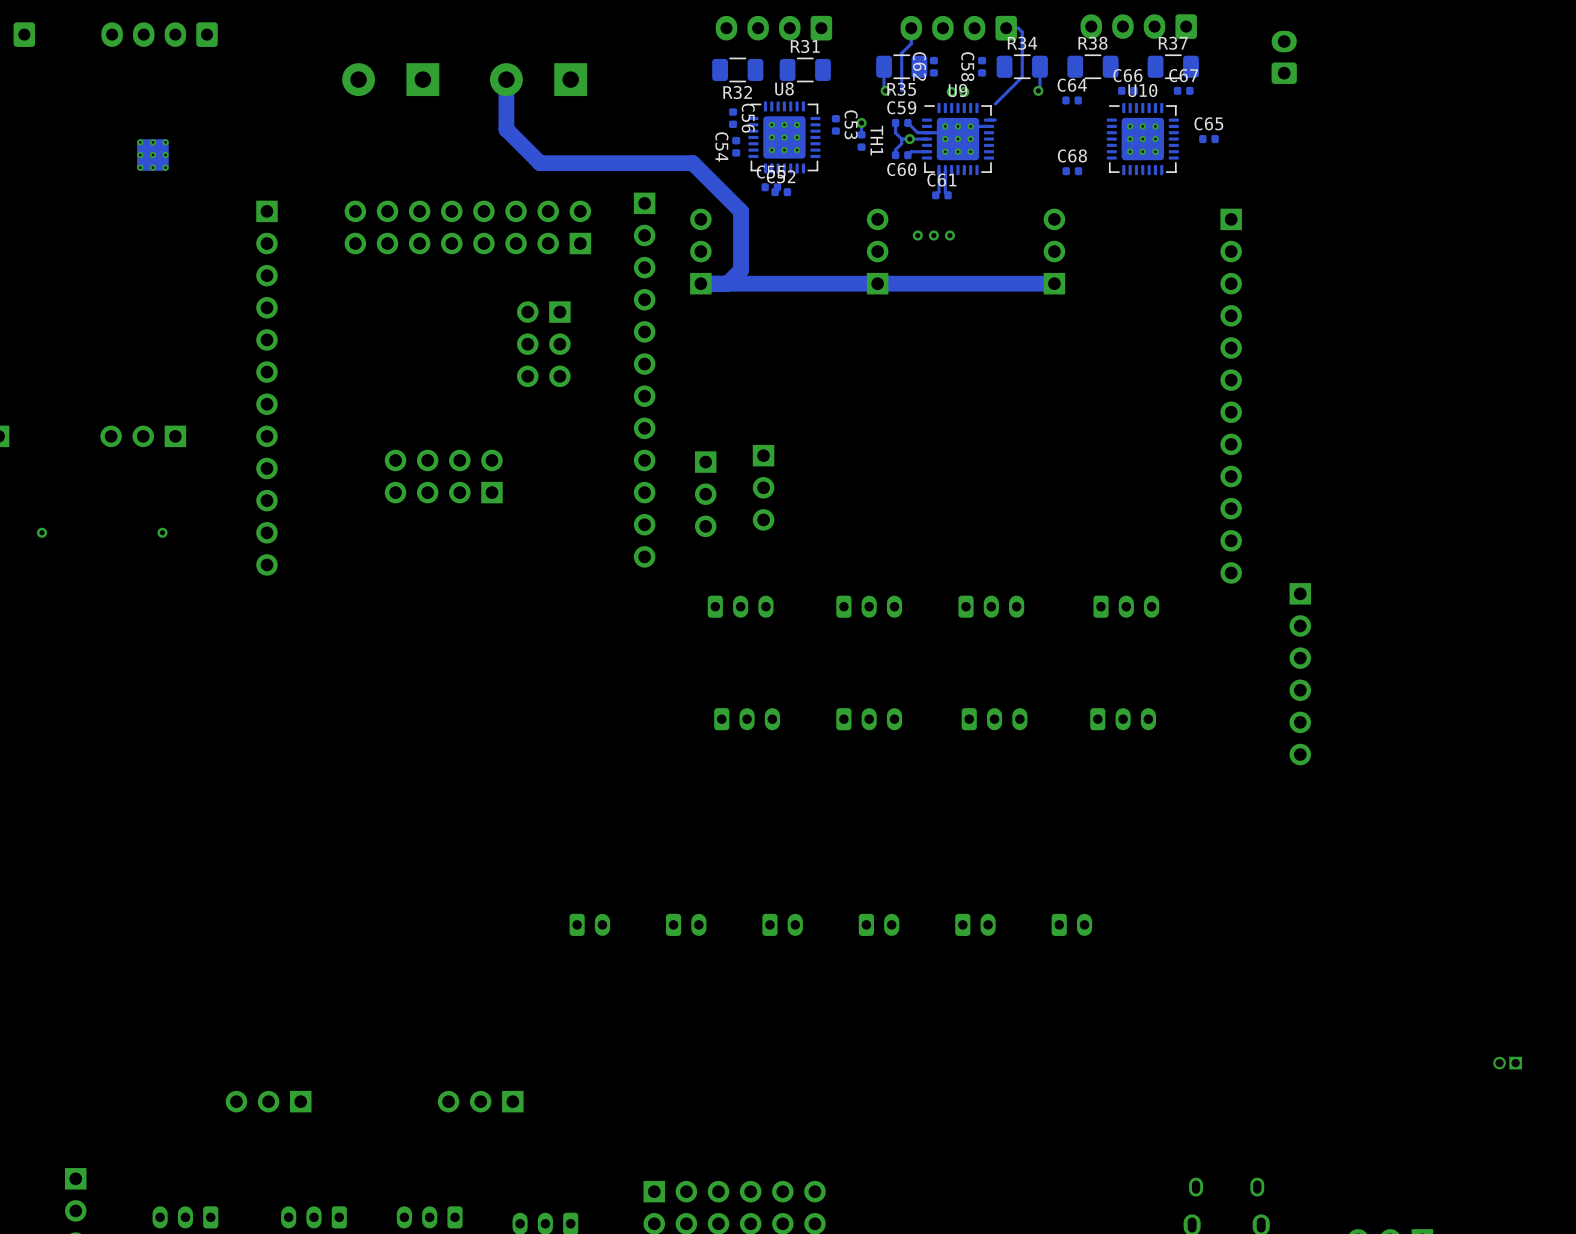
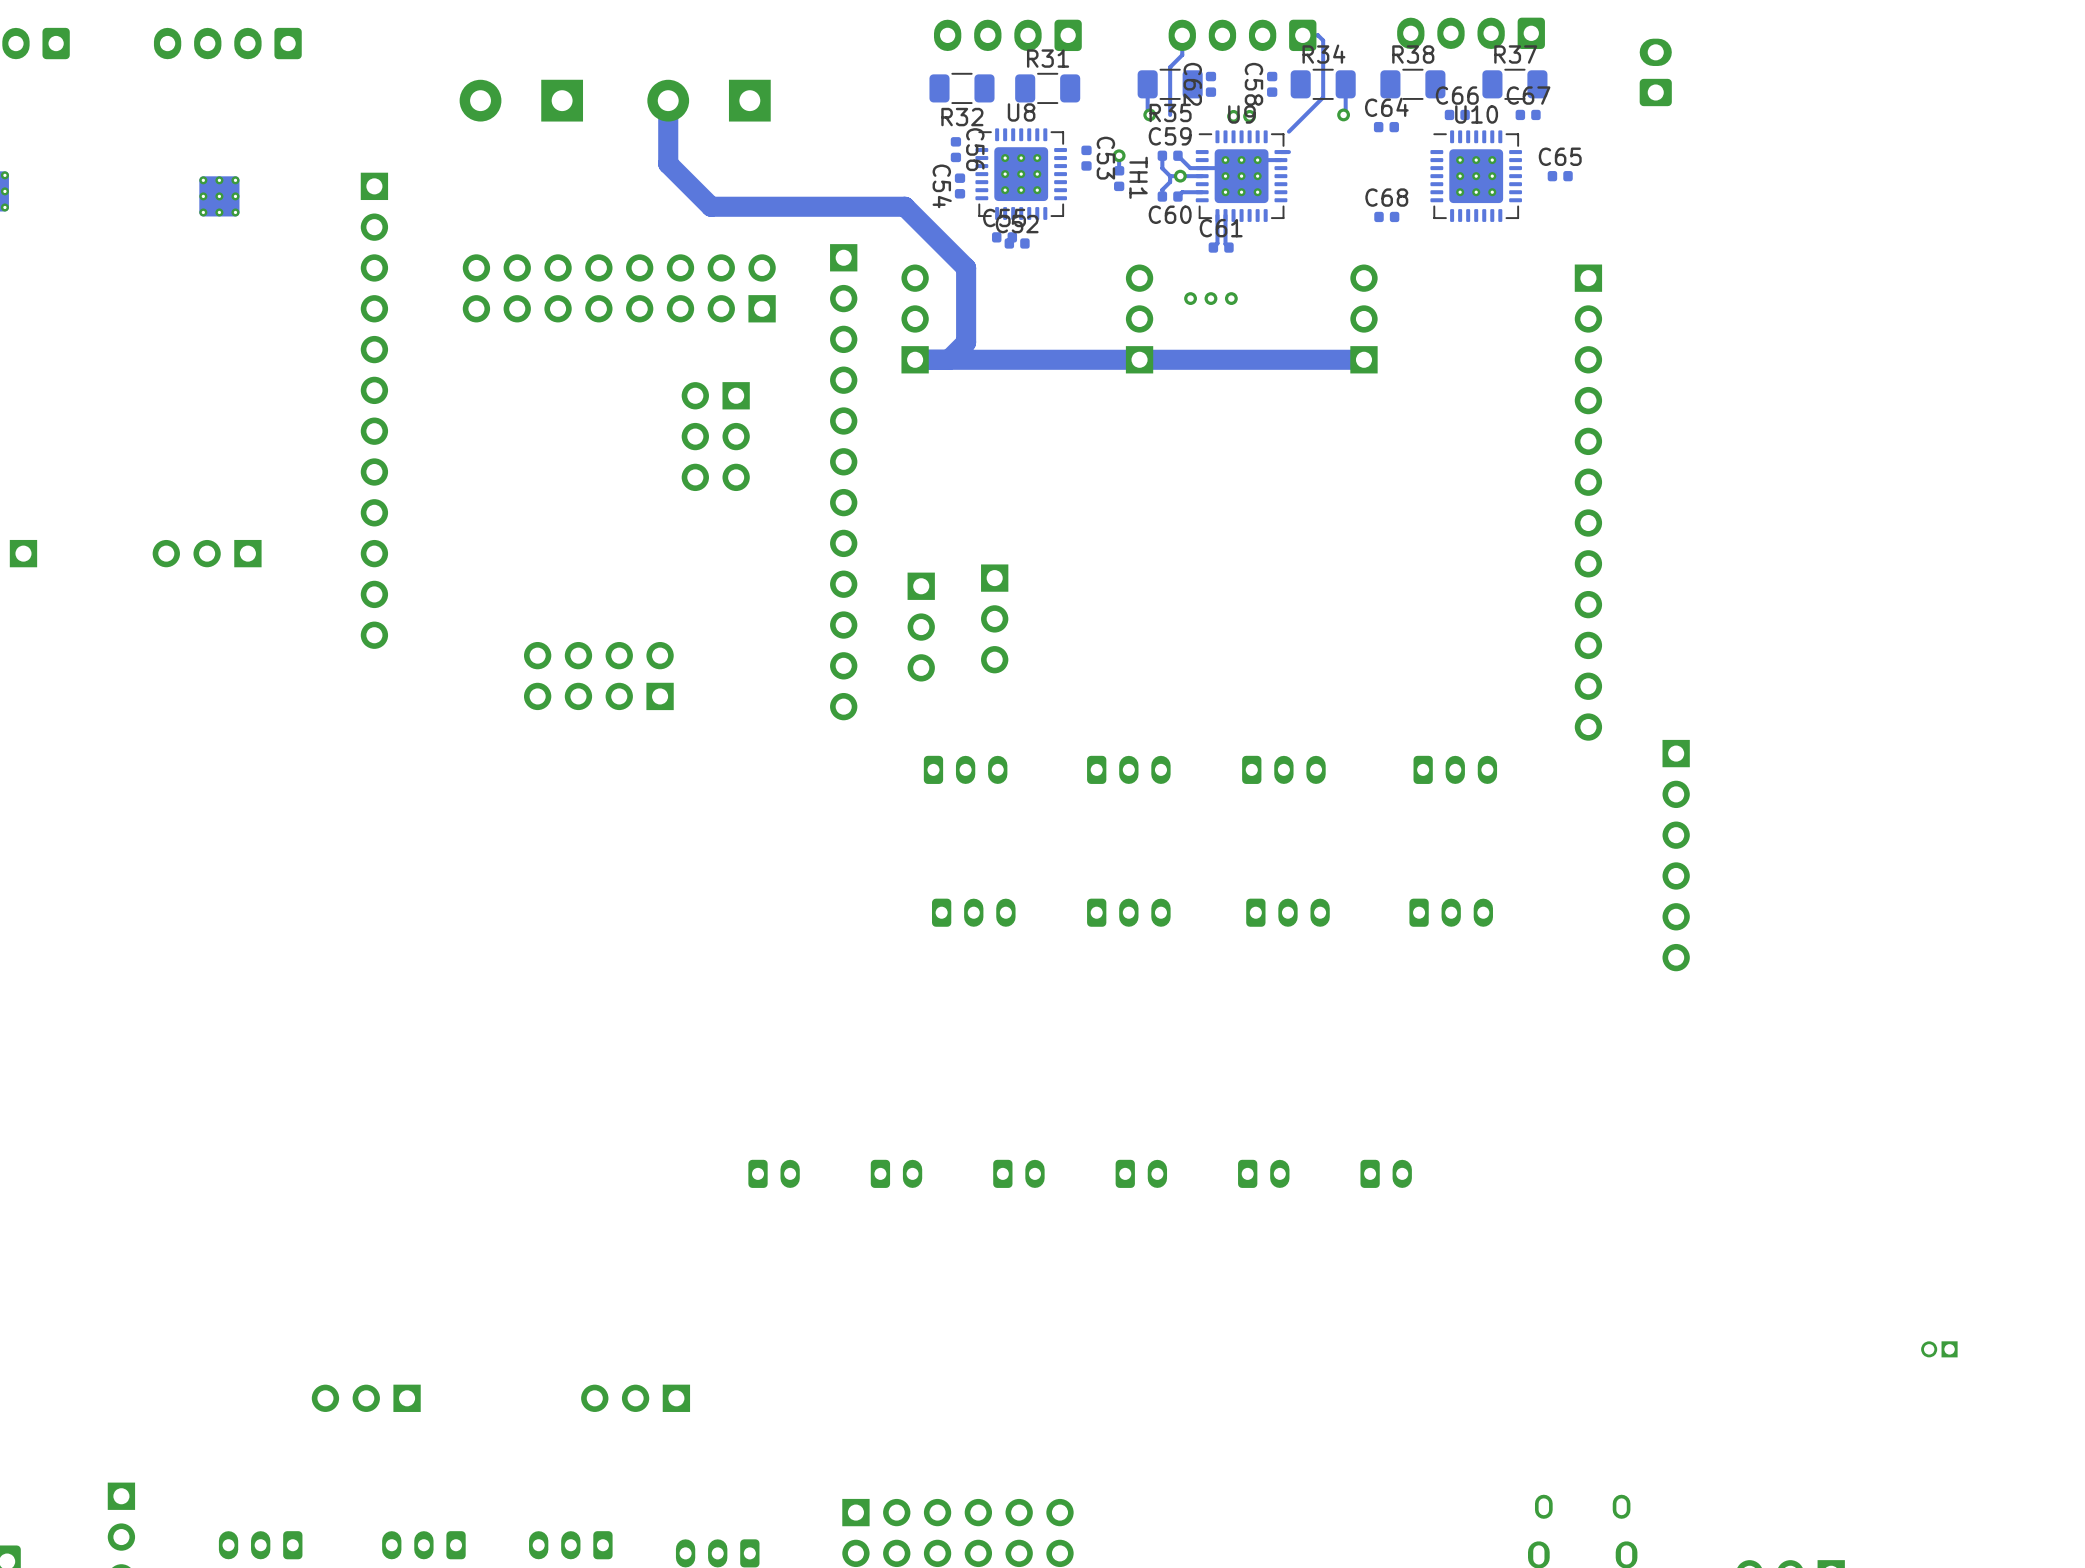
part position: (266, 388) -> (374, 410)
part position: (443, 476) -> (598, 676)
via: (42, 532) -> none
via: (162, 532) -> none

